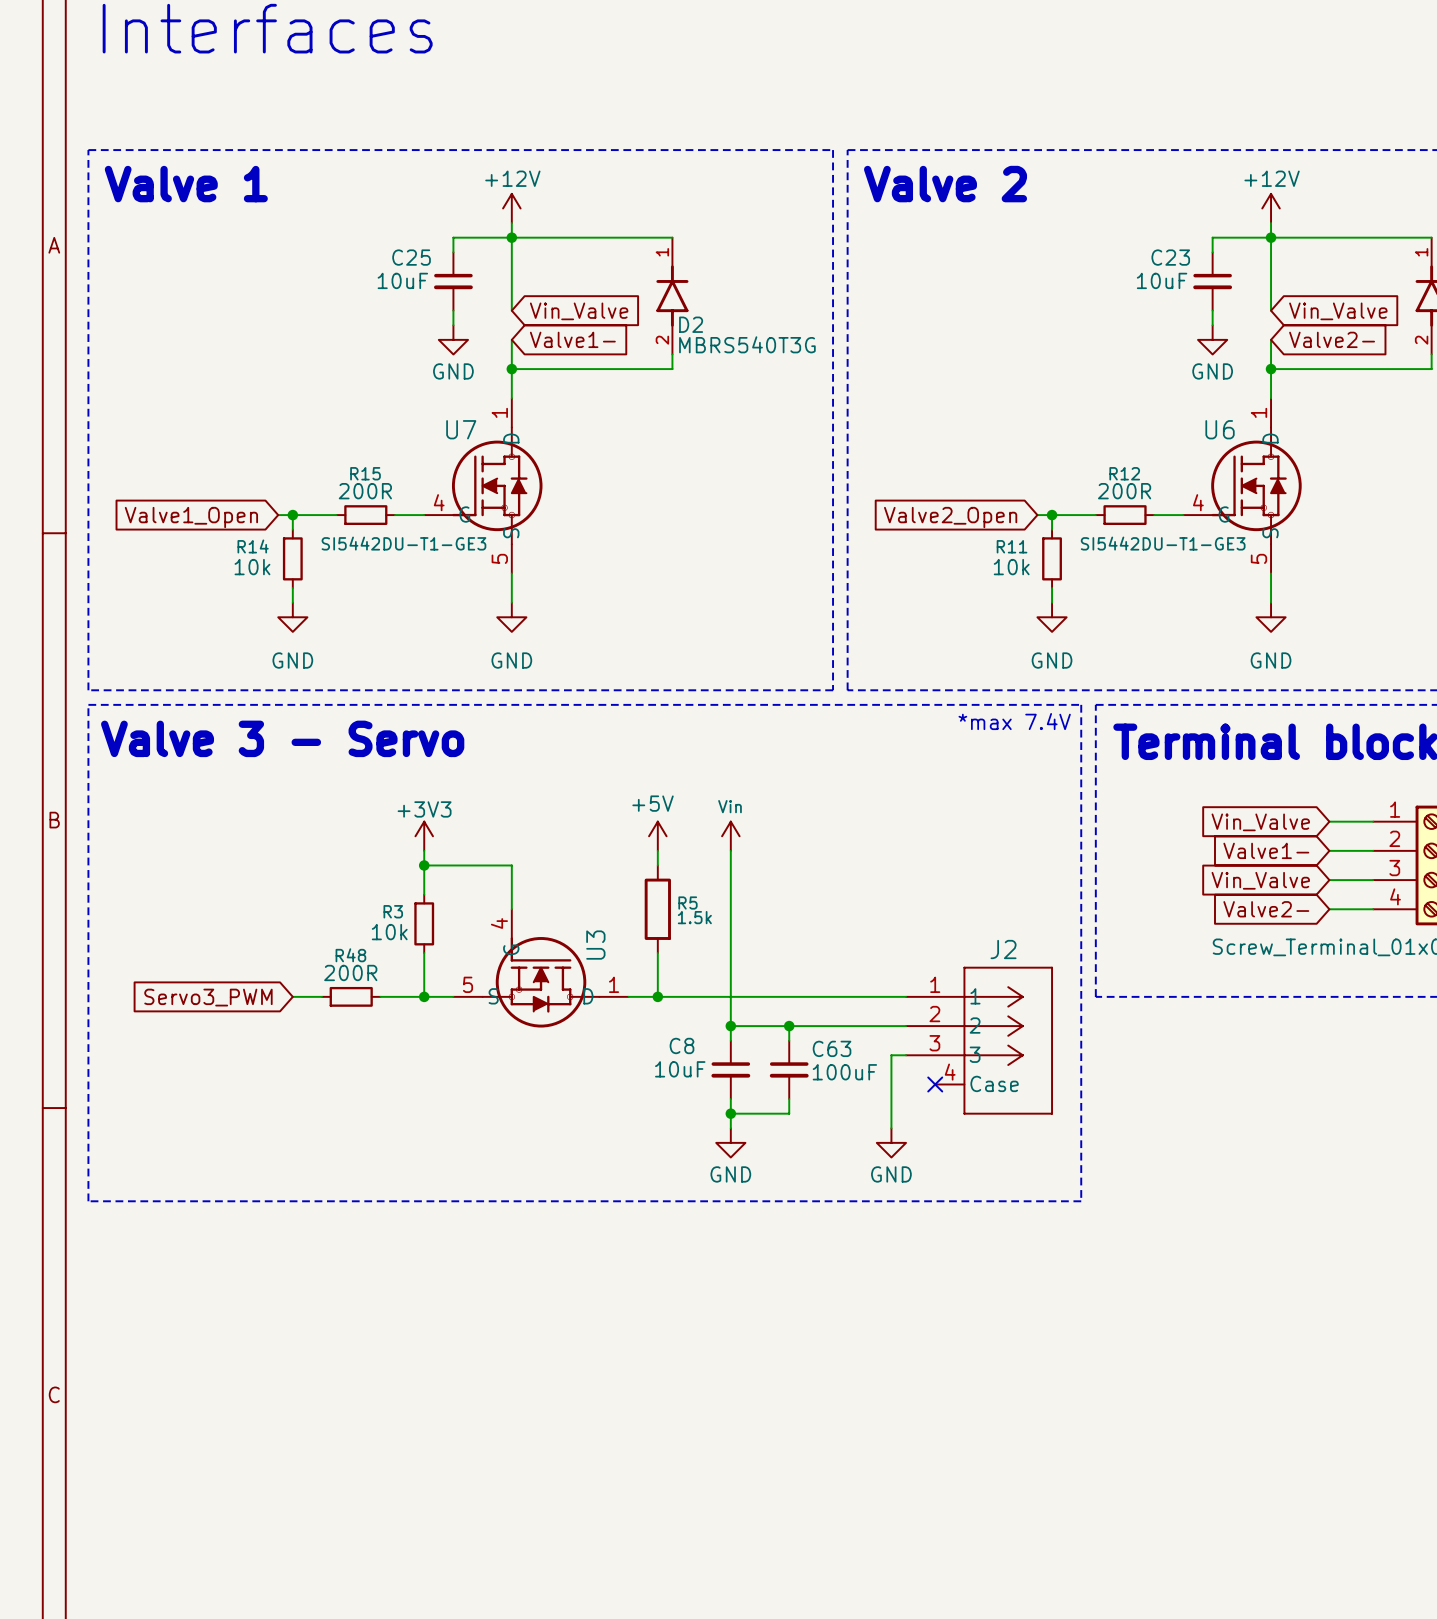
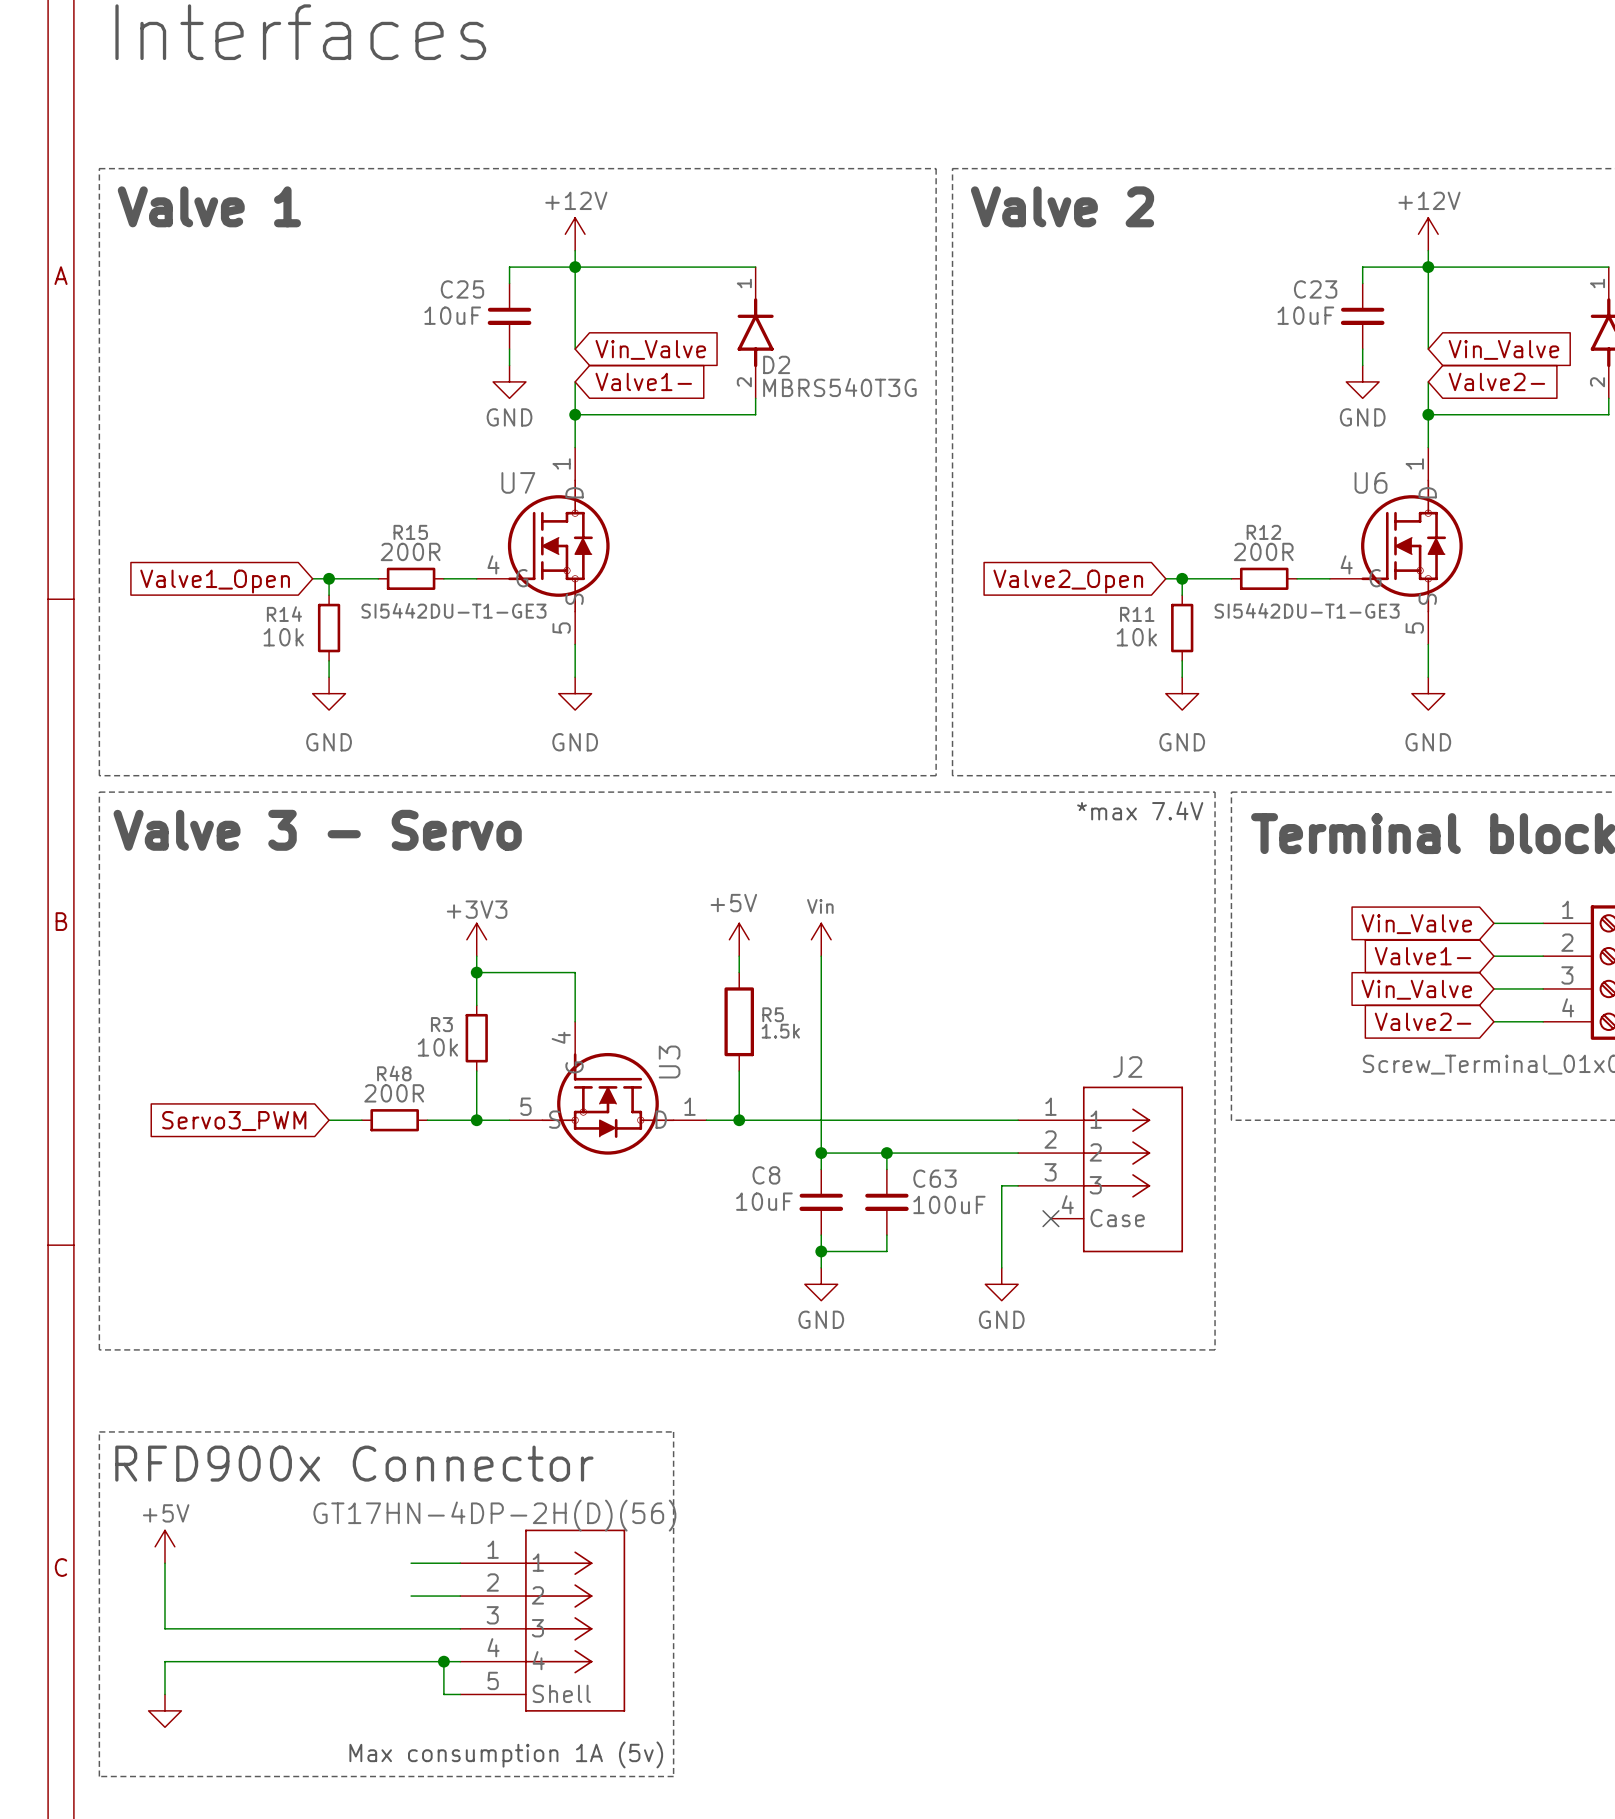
line: none -> (99, 1431) (673, 1431) (673, 1776) (99, 1776) (99, 1431)
text: none -> RFD900x Connector (354, 1463)
power symbol: none -> +5V (164, 1546)
wire: none -> (164, 1563) (164, 1628) (460, 1628)
wire: none -> (411, 1563) (460, 1563)
wire: none -> (411, 1596) (460, 1596)
part: none -> GT17HN-4DP-2H(D)(56) (542, 1620)
wire: none -> (443, 1661) (443, 1694) (460, 1694)
junction: none -> (443, 1661)
wire: none -> (460, 1661) (164, 1661) (164, 1694)
power symbol: none -> (164, 1710)
text: none -> Max consumption 1A (5v) (506, 1754)

